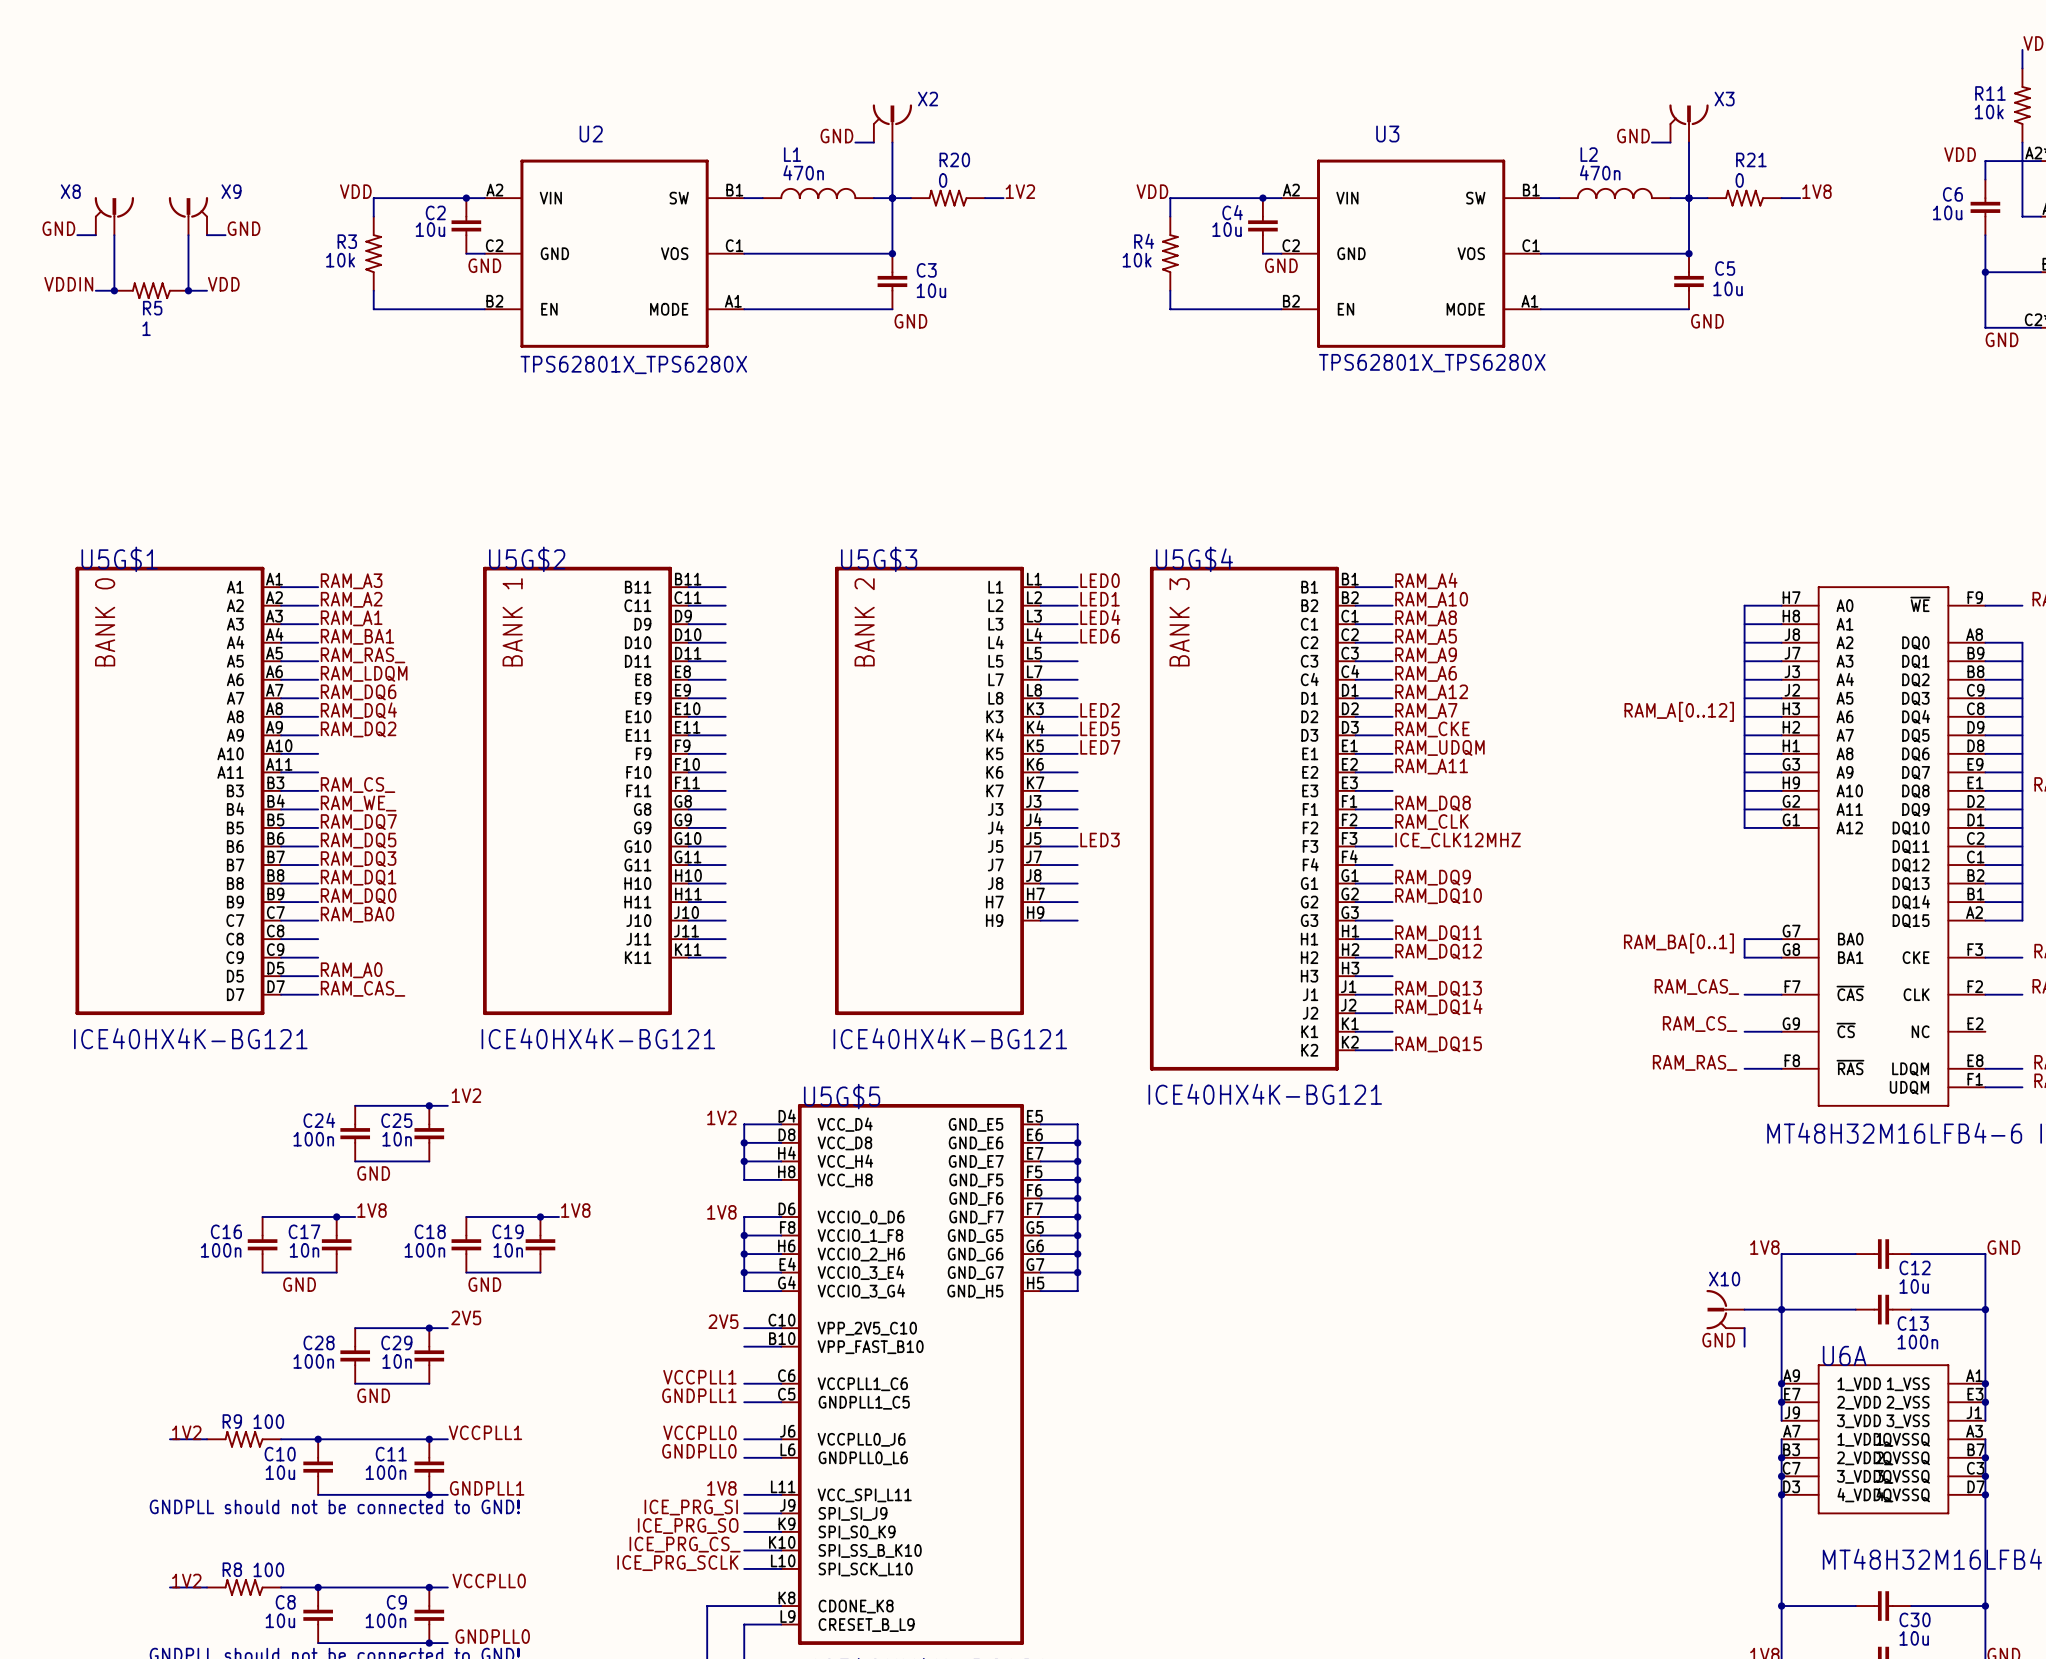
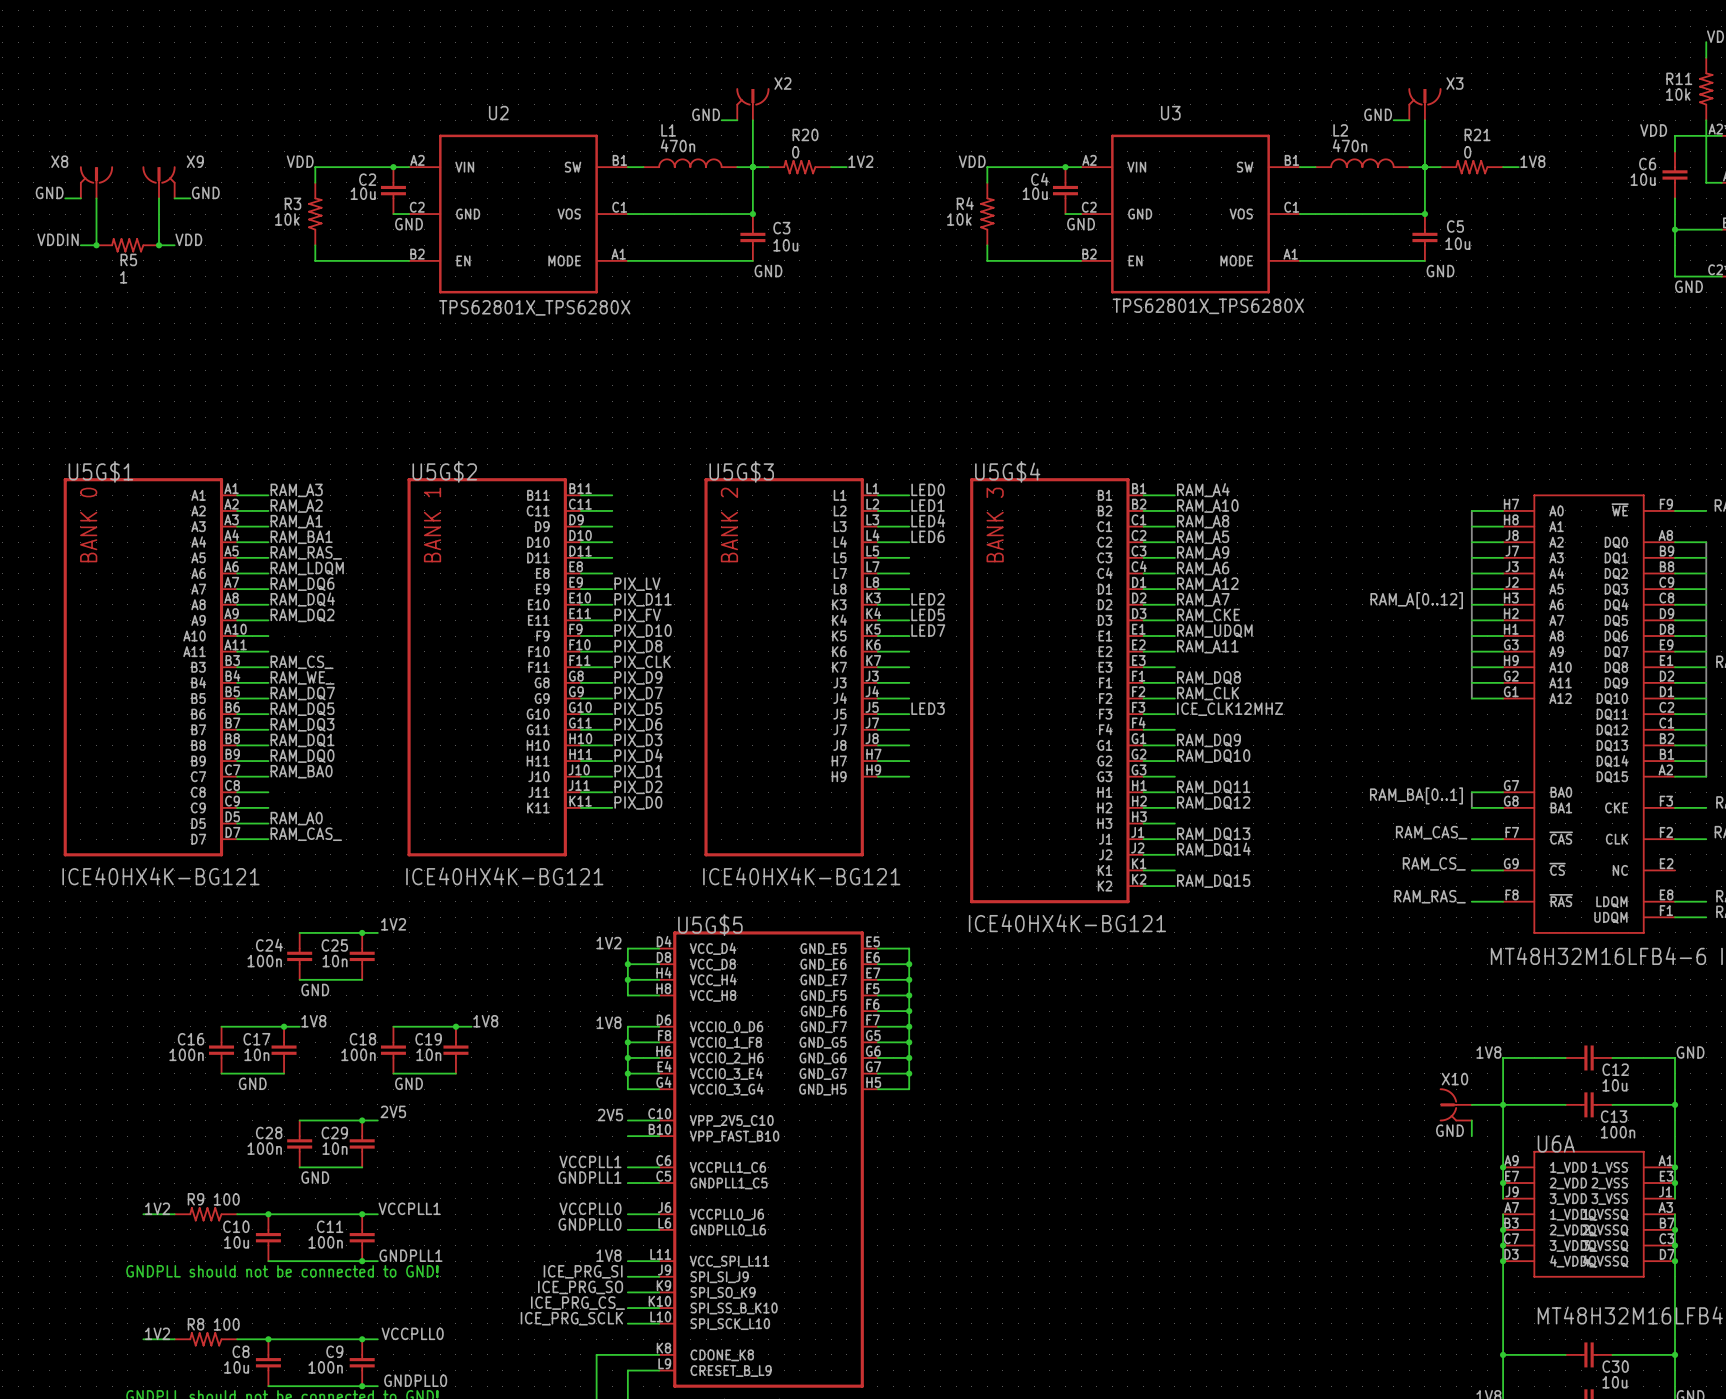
label: none -> PIX_LV (637, 584)
label: none -> PIX_D11 (643, 599)
label: none -> PIX_FV (637, 615)
label: none -> PIX_D10 (643, 631)
label: none -> PIX_D8 (638, 646)
label: none -> PIX_CLK (642, 662)
label: none -> PIX_D9 (638, 677)
label: none -> PIX_D7 (638, 693)
label: none -> PIX_D5 (638, 709)
label: none -> PIX_D6 (638, 724)
label: none -> PIX_D3 (638, 740)
label: none -> PIX_D4 (638, 755)
label: none -> PIX_D1 (638, 771)
label: none -> PIX_D2 (638, 787)
label: none -> PIX_D0 (638, 802)

